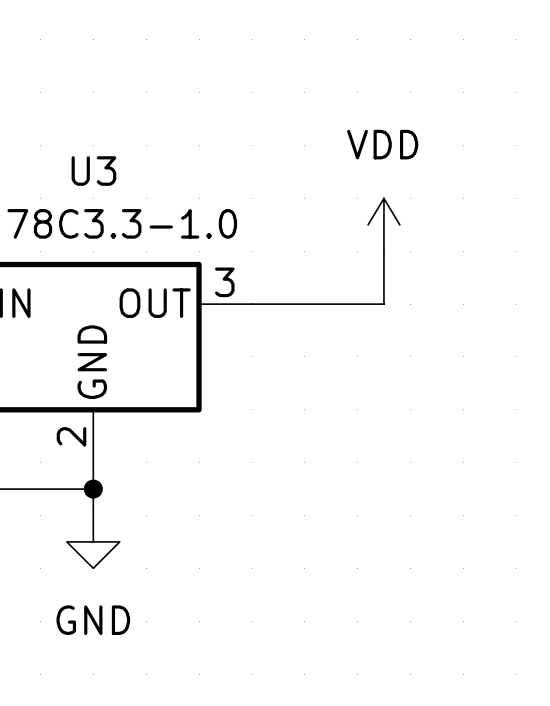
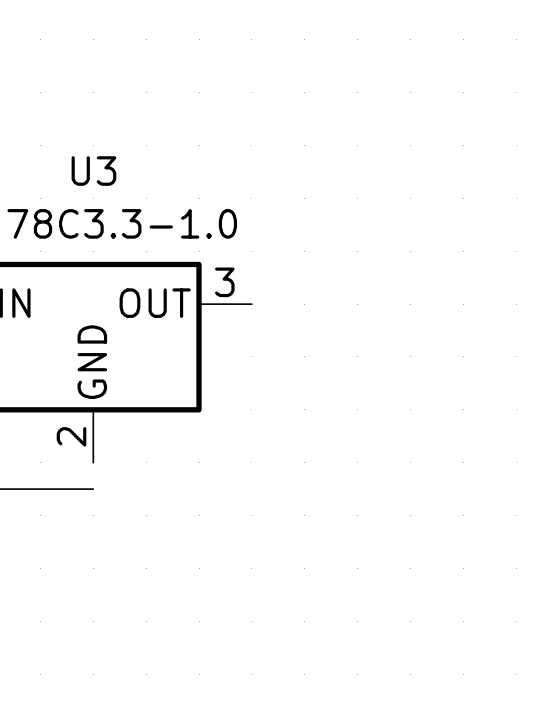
power symbol: VDD (383, 224) -> none
wire: (383, 251) (383, 304) (251, 304) -> none
wire: (93, 462) (93, 515) -> none
junction: (93, 489) -> none
power symbol: GND (93, 541) -> none

